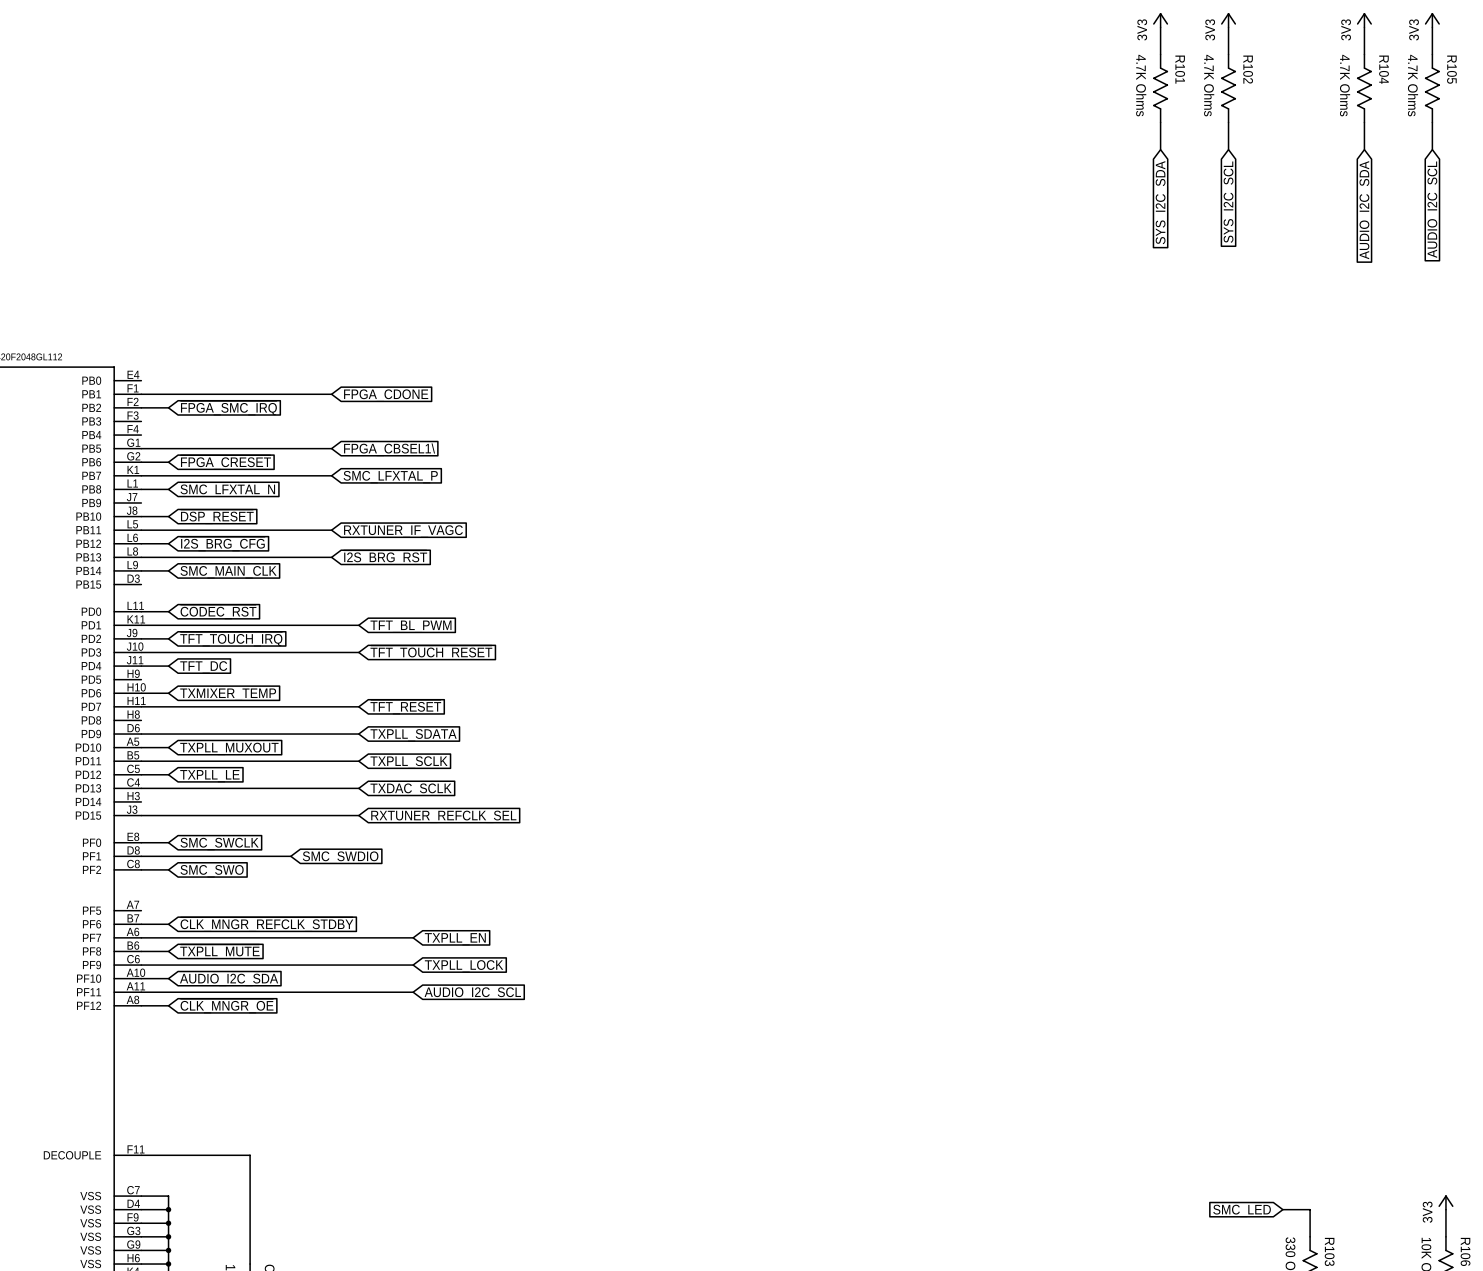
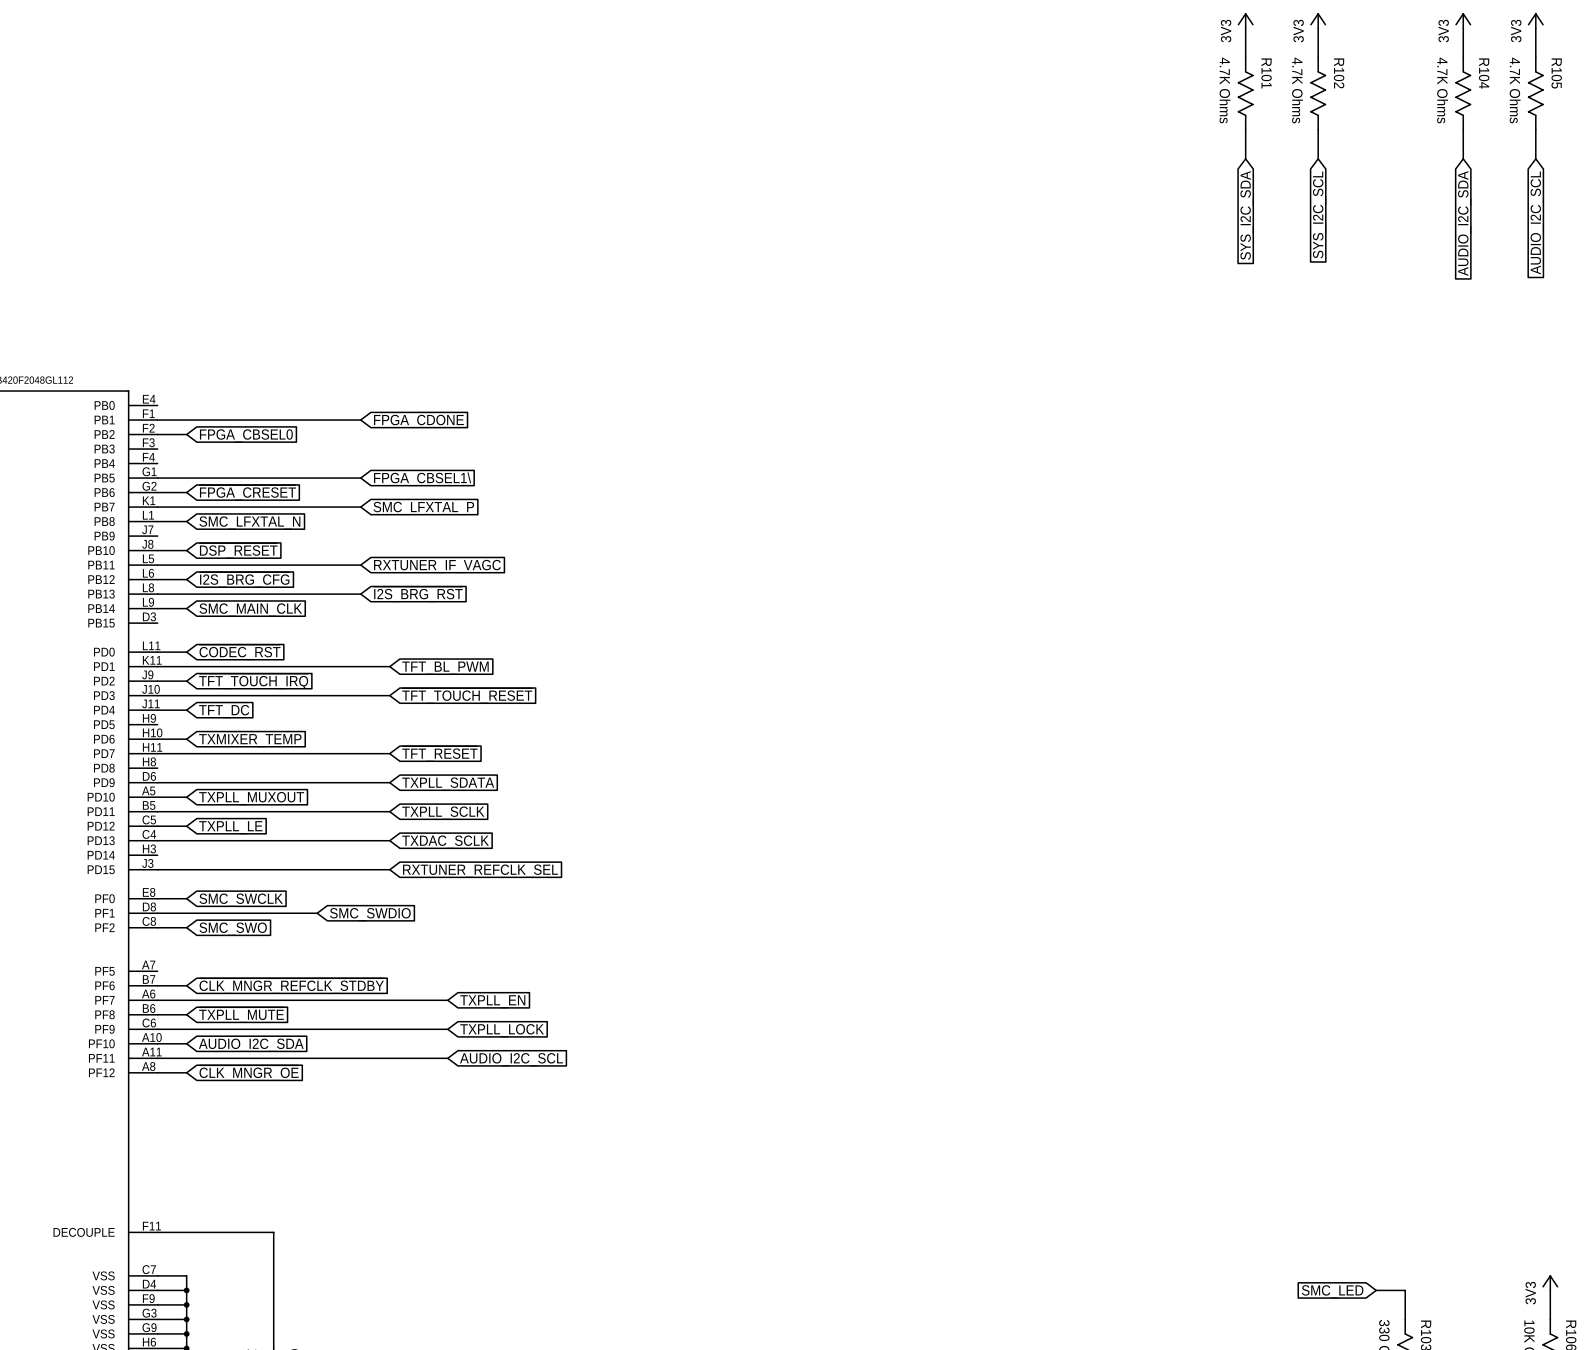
global label: ~{FPGA_SMC_IRQ} (228, 408) -> FPGA_CBSEL0 (246, 435)

